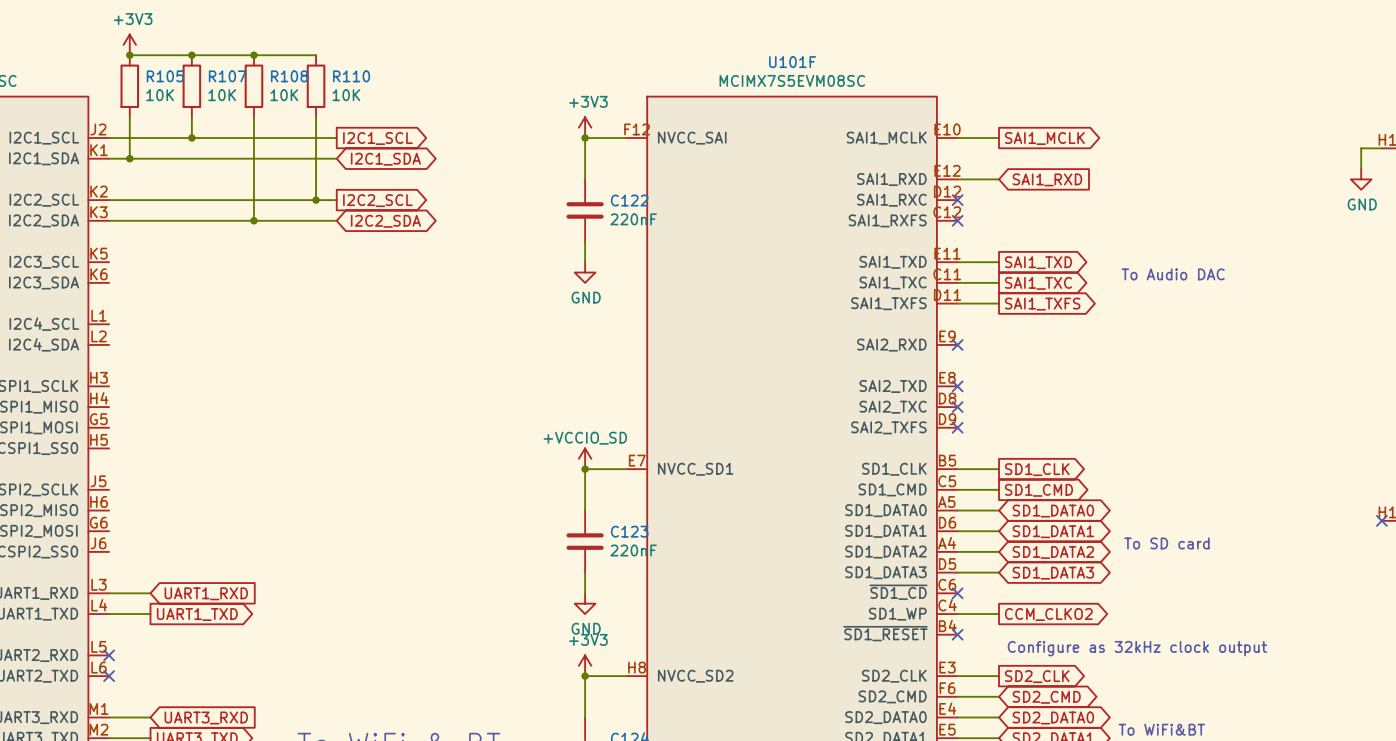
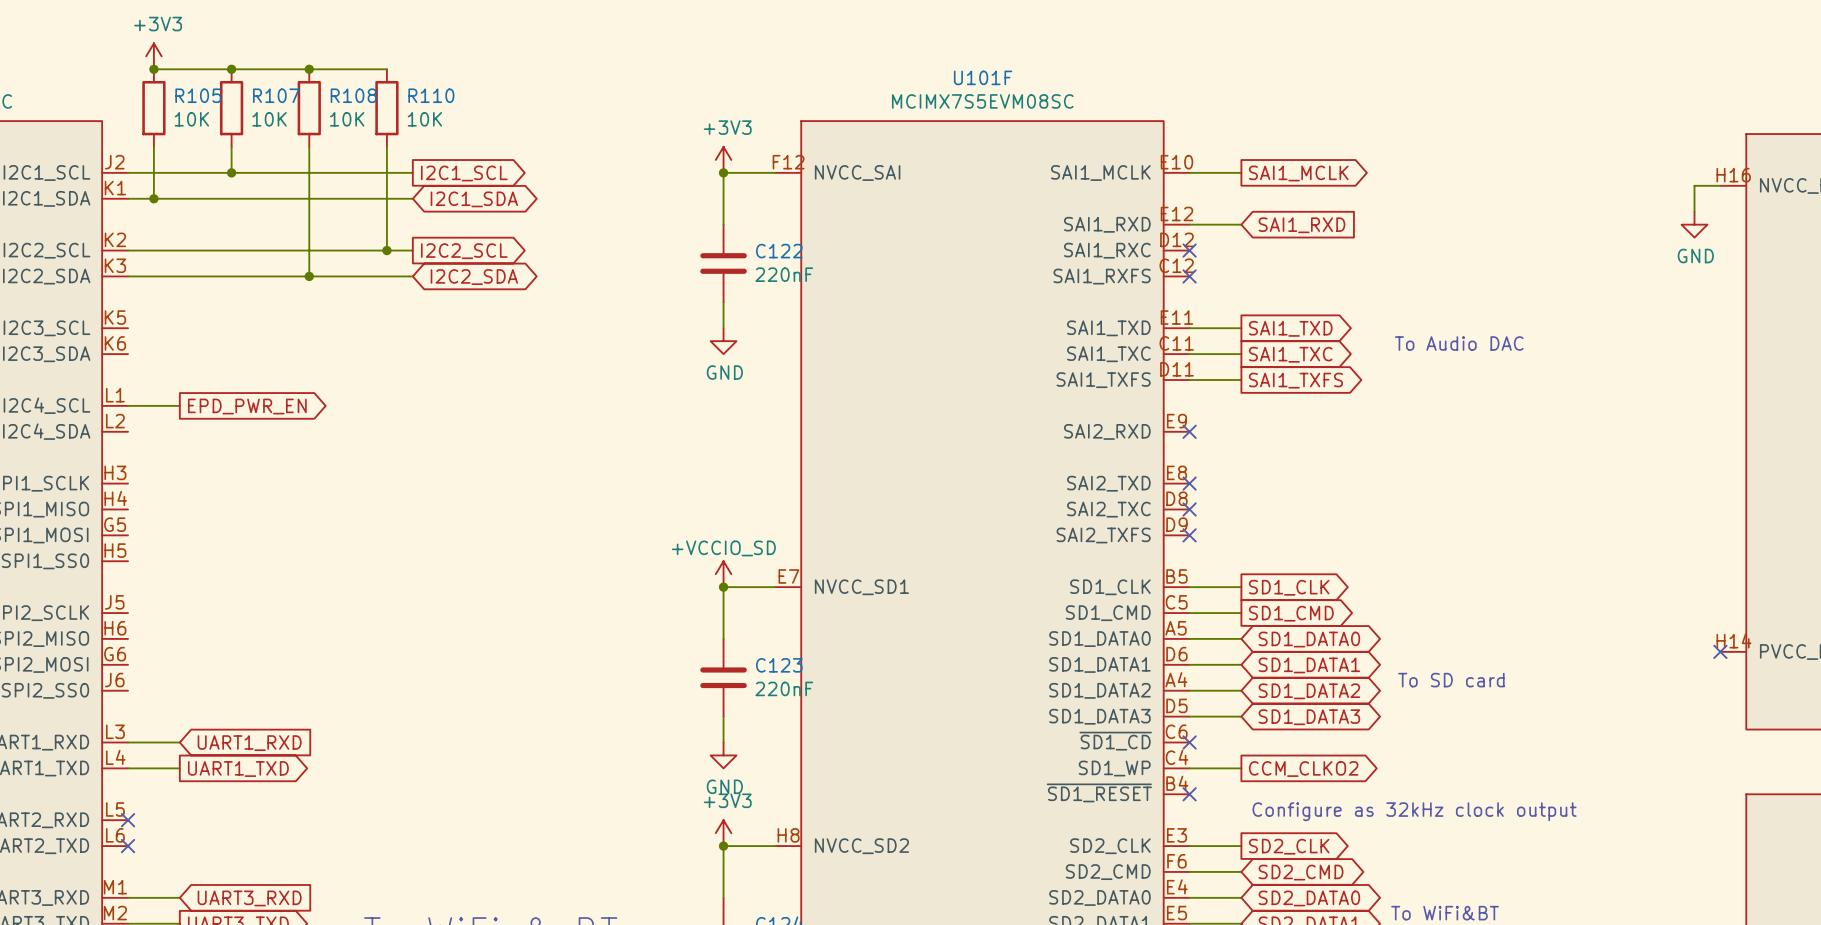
wire: none -> (128, 405) (179, 405)
global label: none -> EPD_PWR_EN (247, 406)

